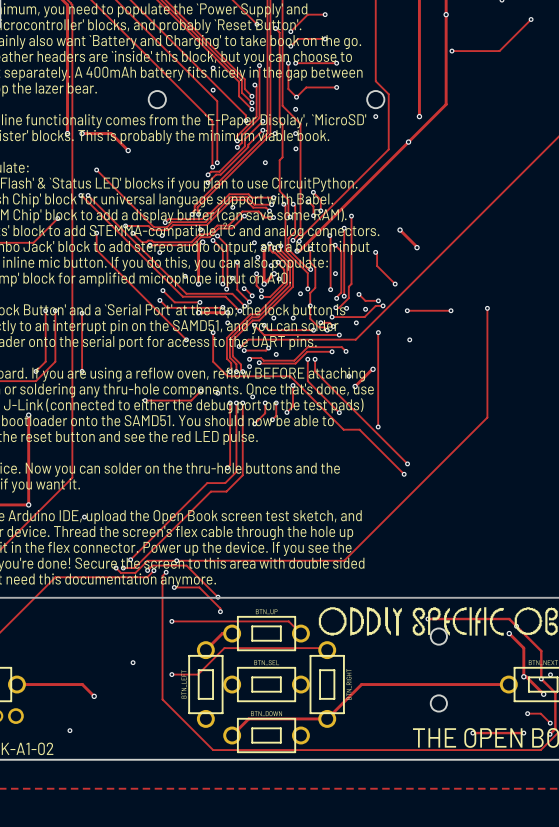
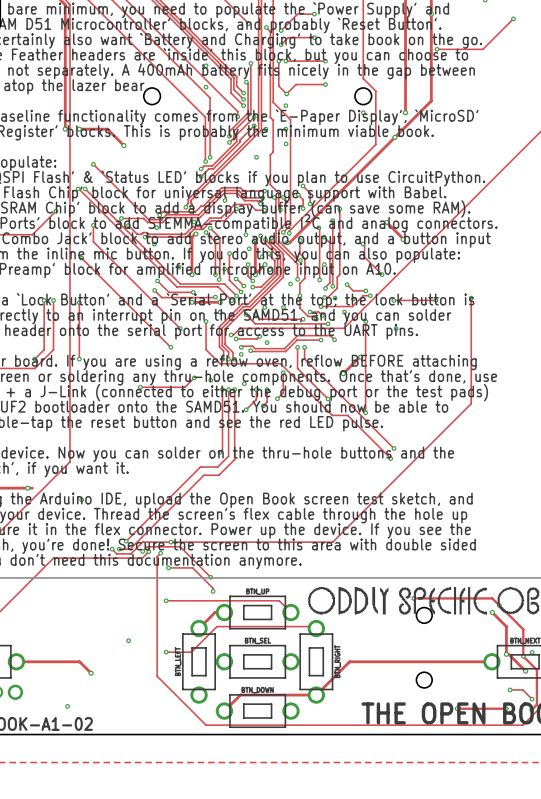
track: none -> (81, 258) (170, 347)
via: none -> (81, 258)
via: none -> (170, 347)
track: (28, 415) (28, 504) -> (32, 488) (27, 488)
via: (28, 415) -> none

